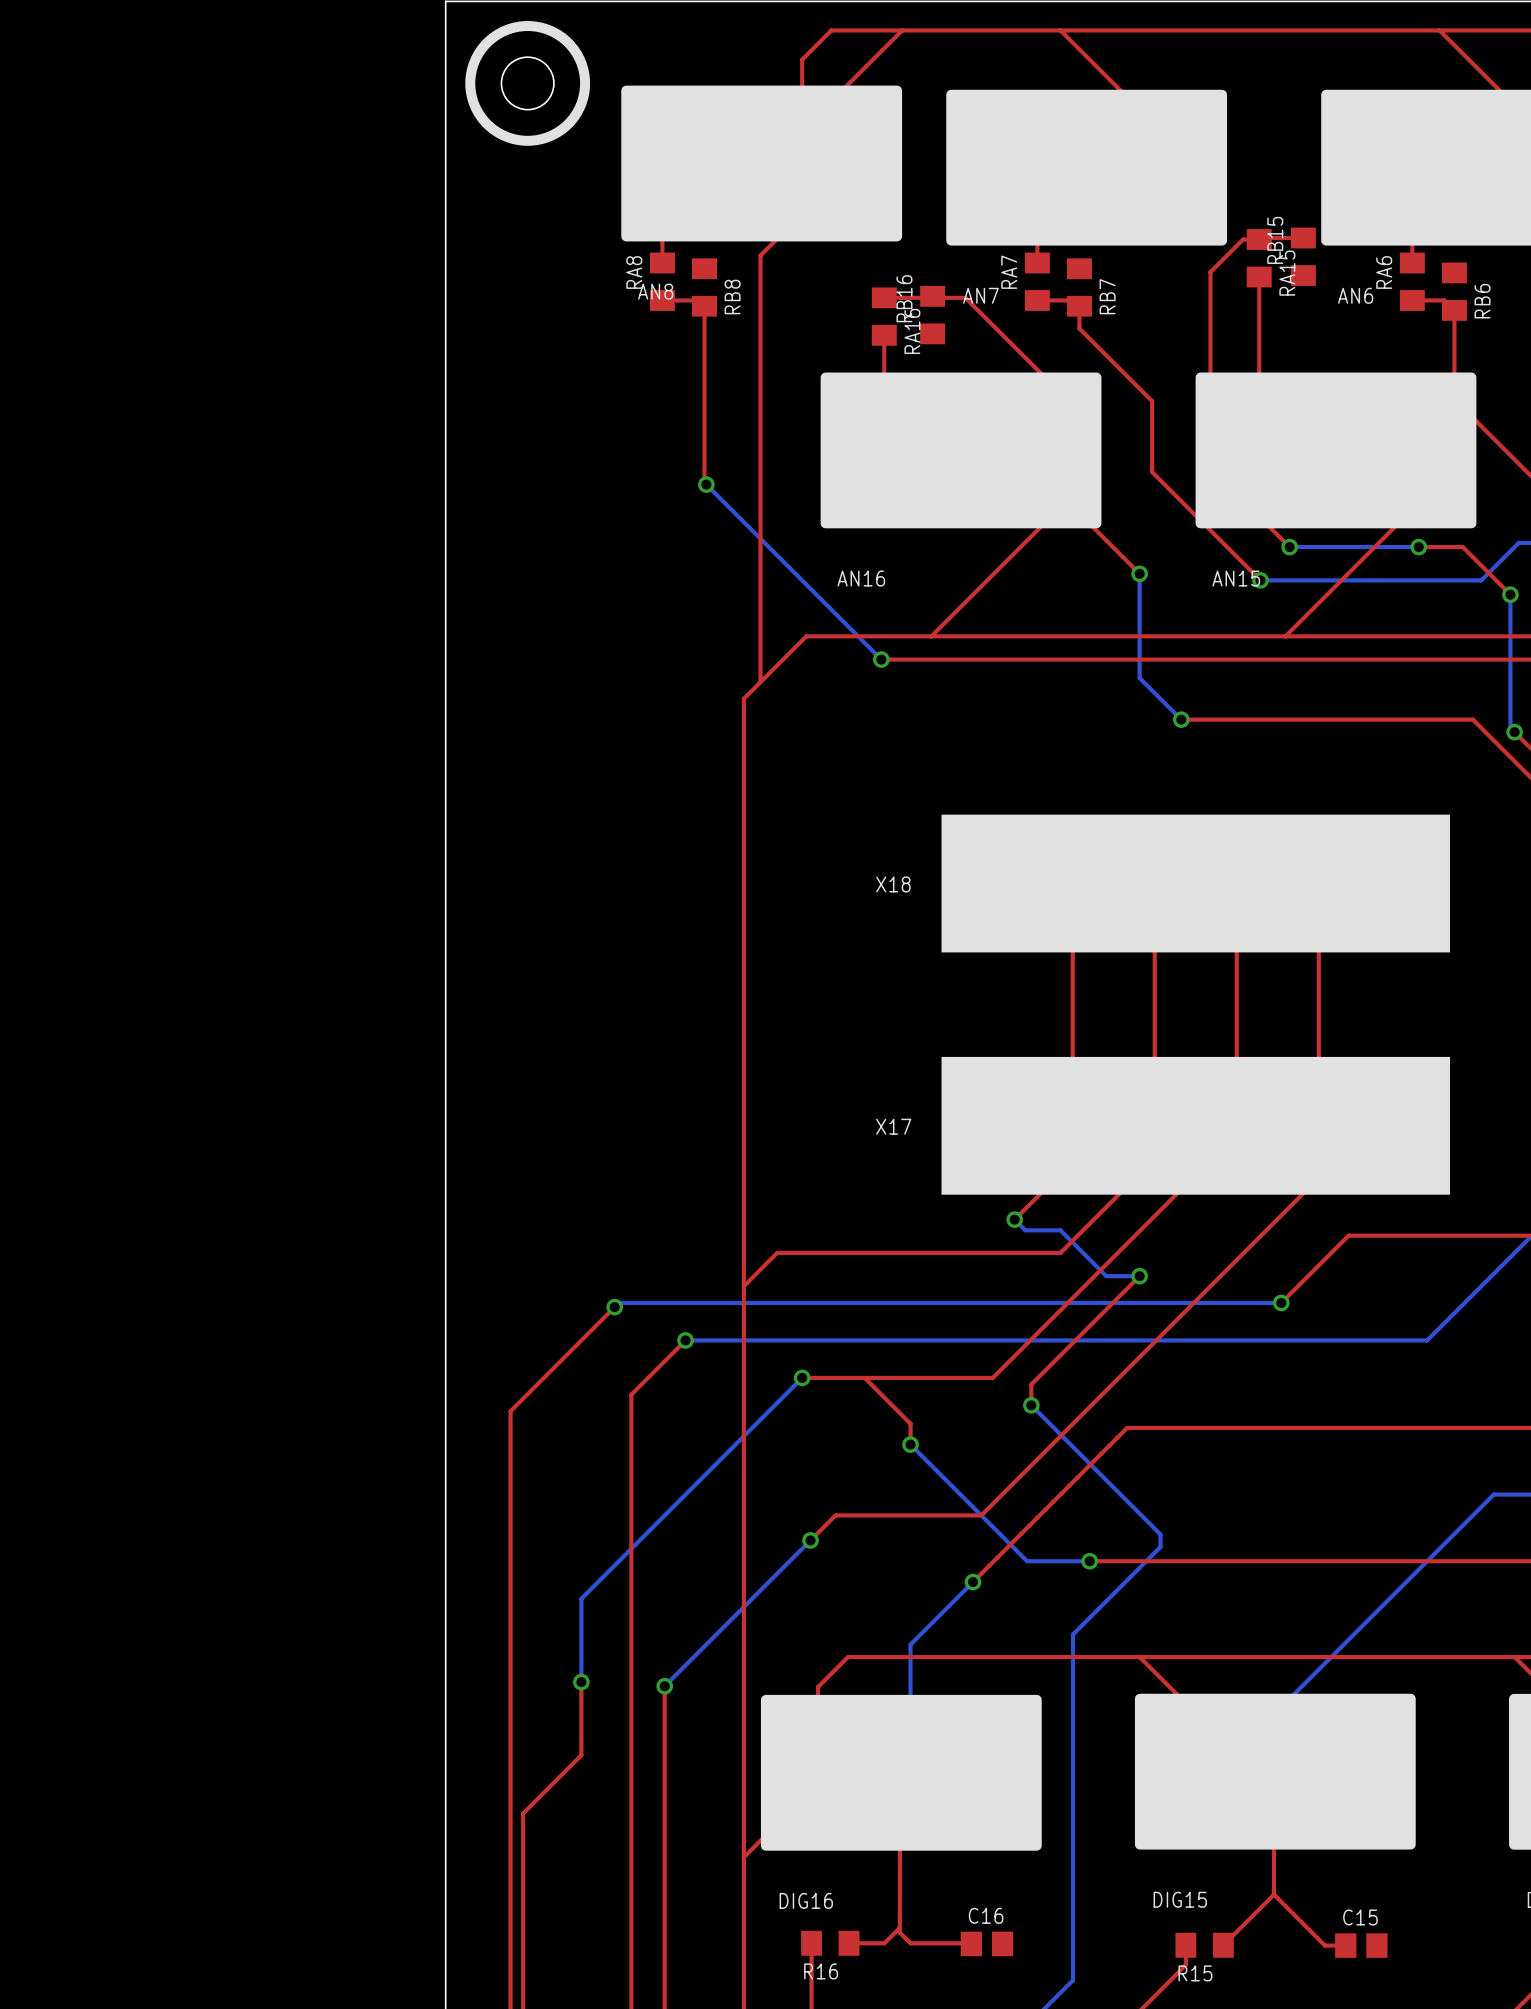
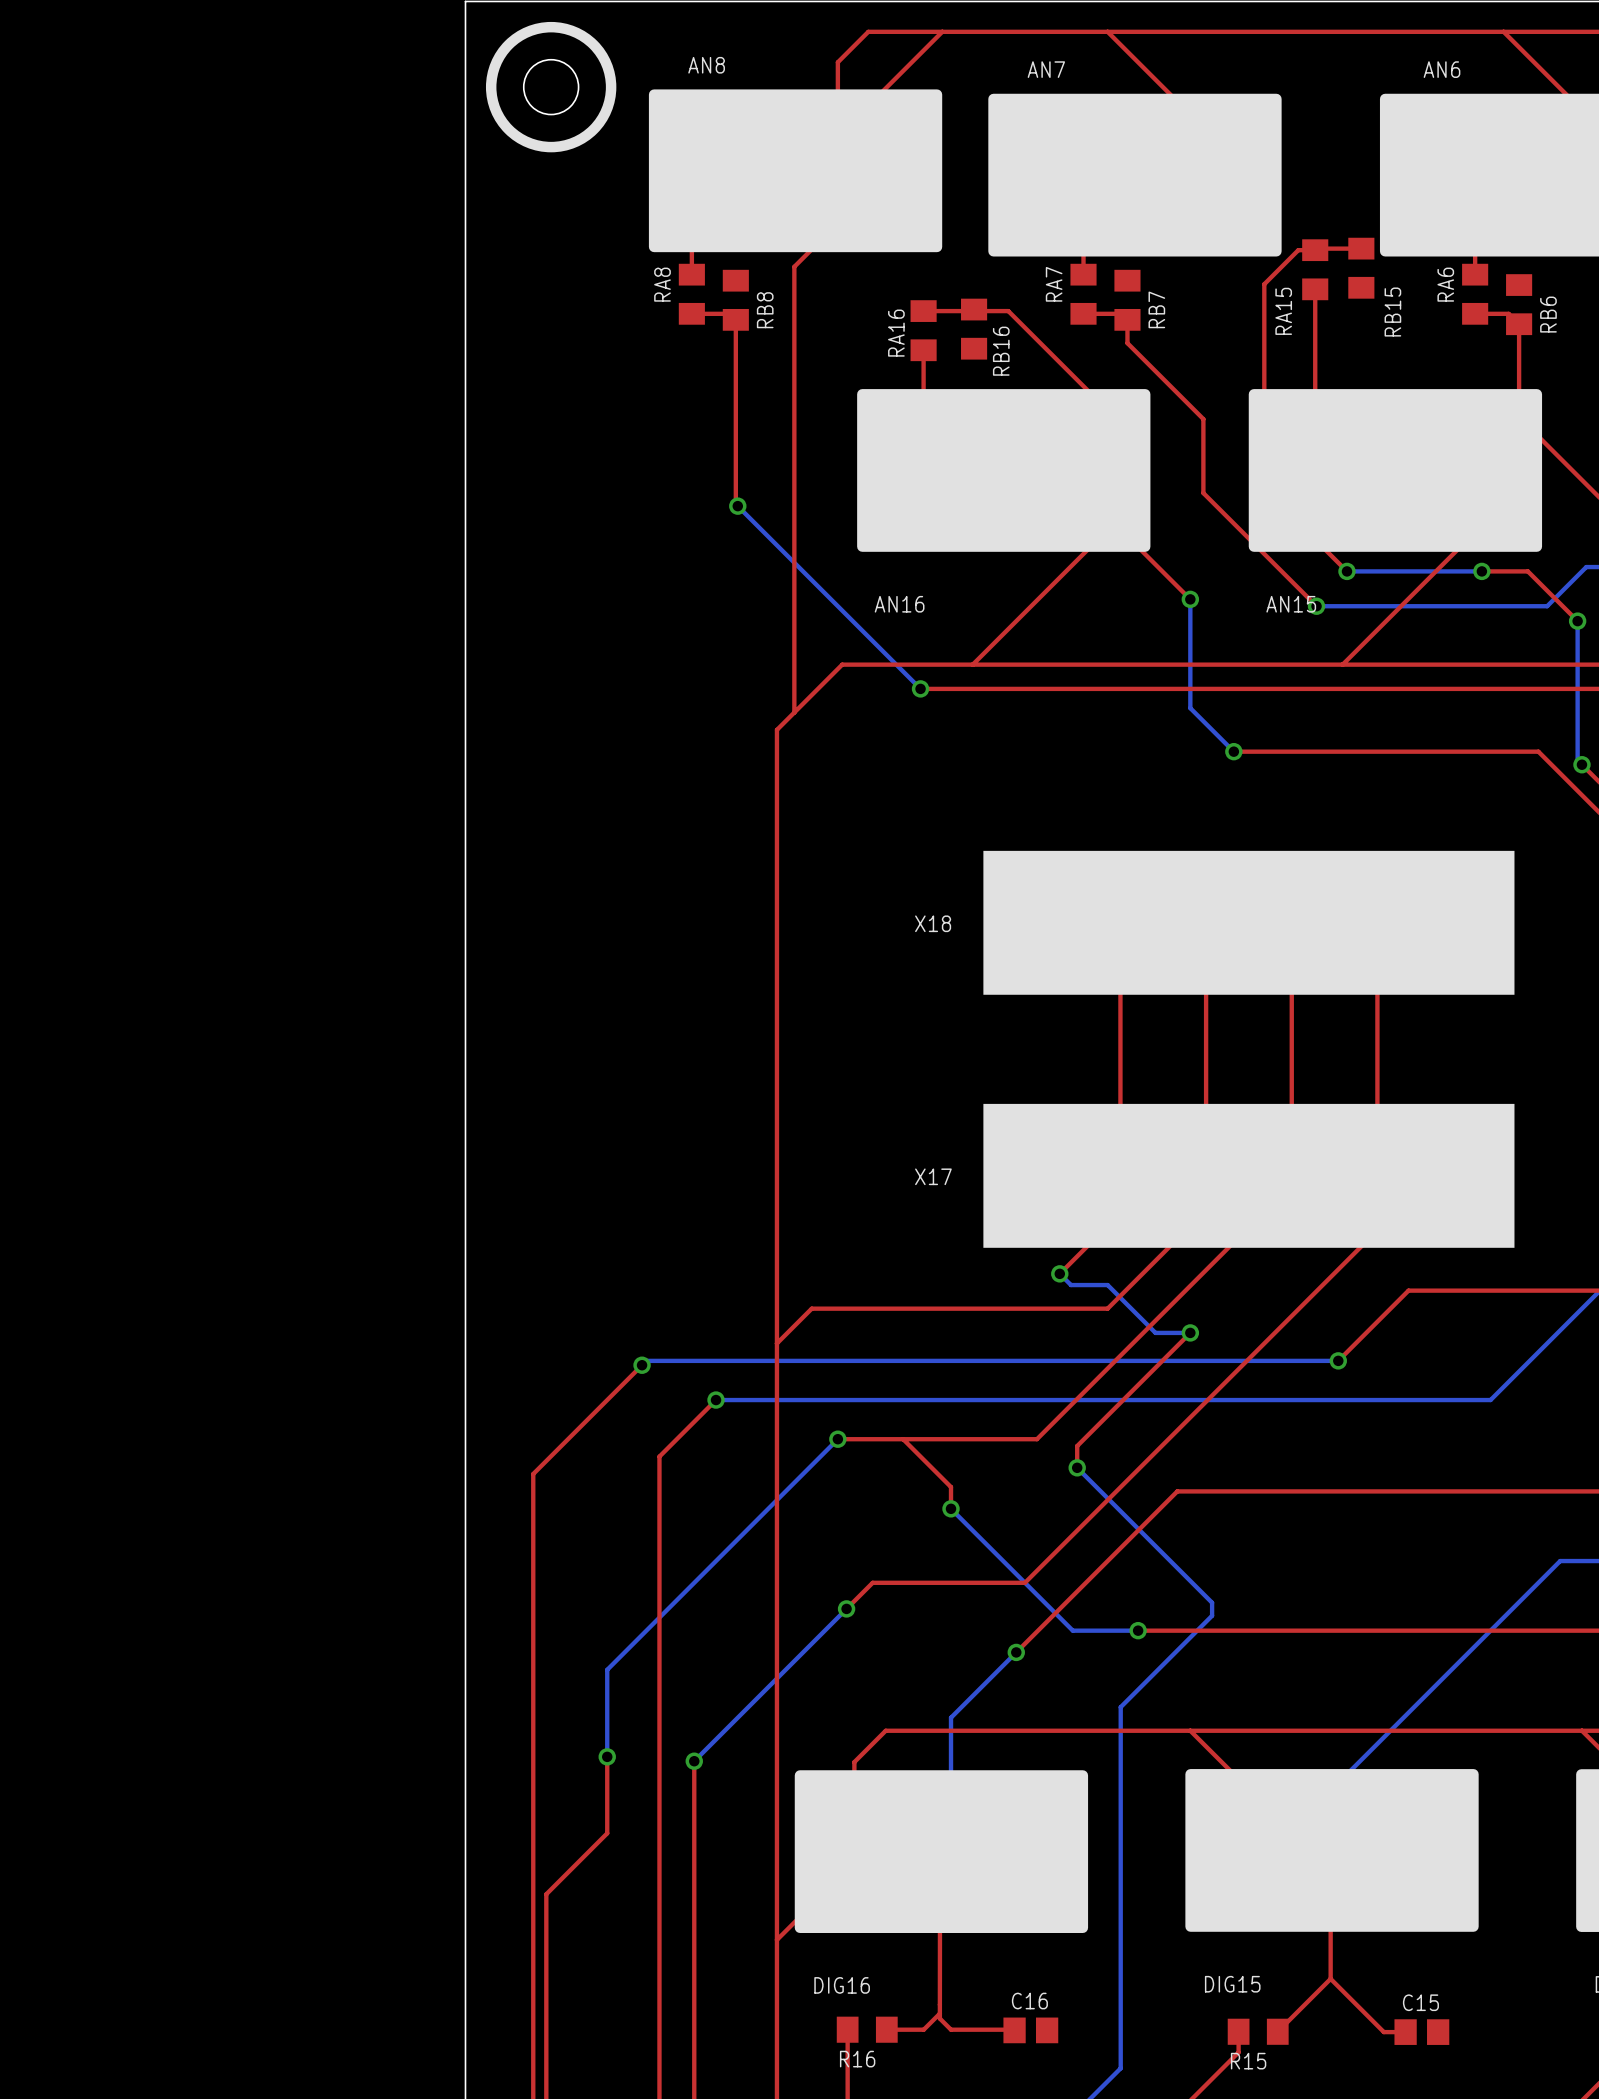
RB15 name position: RB15 (1275, 240) -> RB15 (1392, 312)
RA15 name position: RA15 (1287, 273) -> RA15 (1283, 311)
AN8 name position: AN8 (655, 291) -> AN8 (706, 65)
AN7 name position: AN7 (980, 295) -> AN7 (1046, 69)
AN6 name position: AN6 (1355, 295) -> AN6 (1442, 69)
RB16 name position: RB16 (904, 298) -> RB16 (1001, 351)
RA16 name position: RA16 (912, 331) -> RA16 (896, 333)

